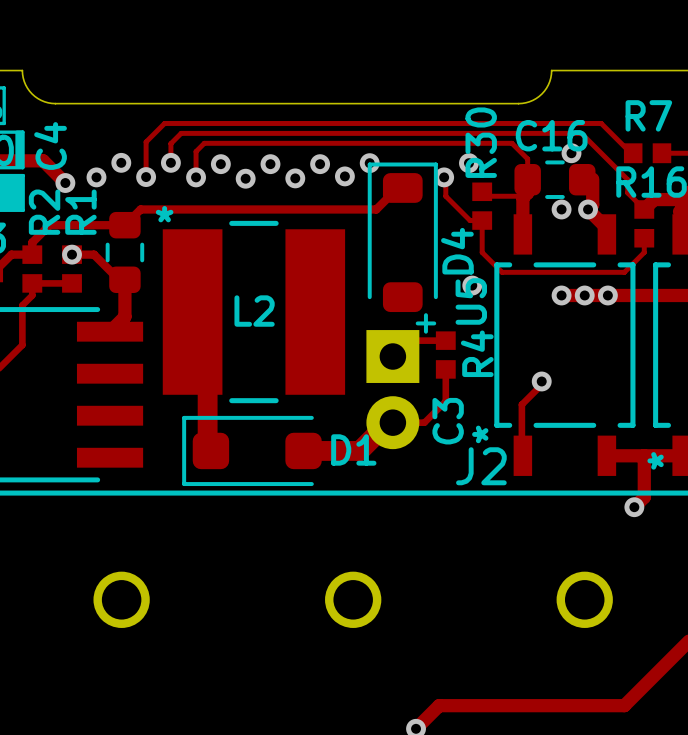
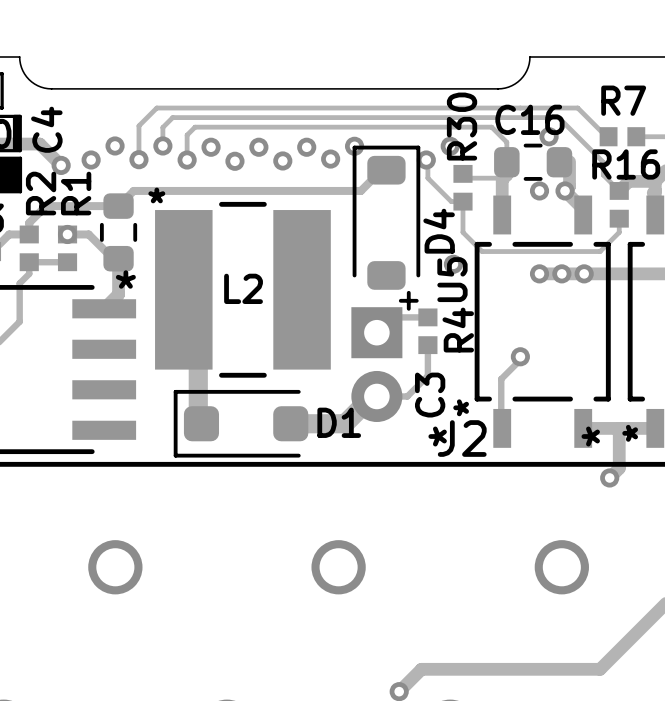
L2 text: none -> * (125, 279)
U5 text: none -> * (437, 436)
part text: none -> * (590, 436)

